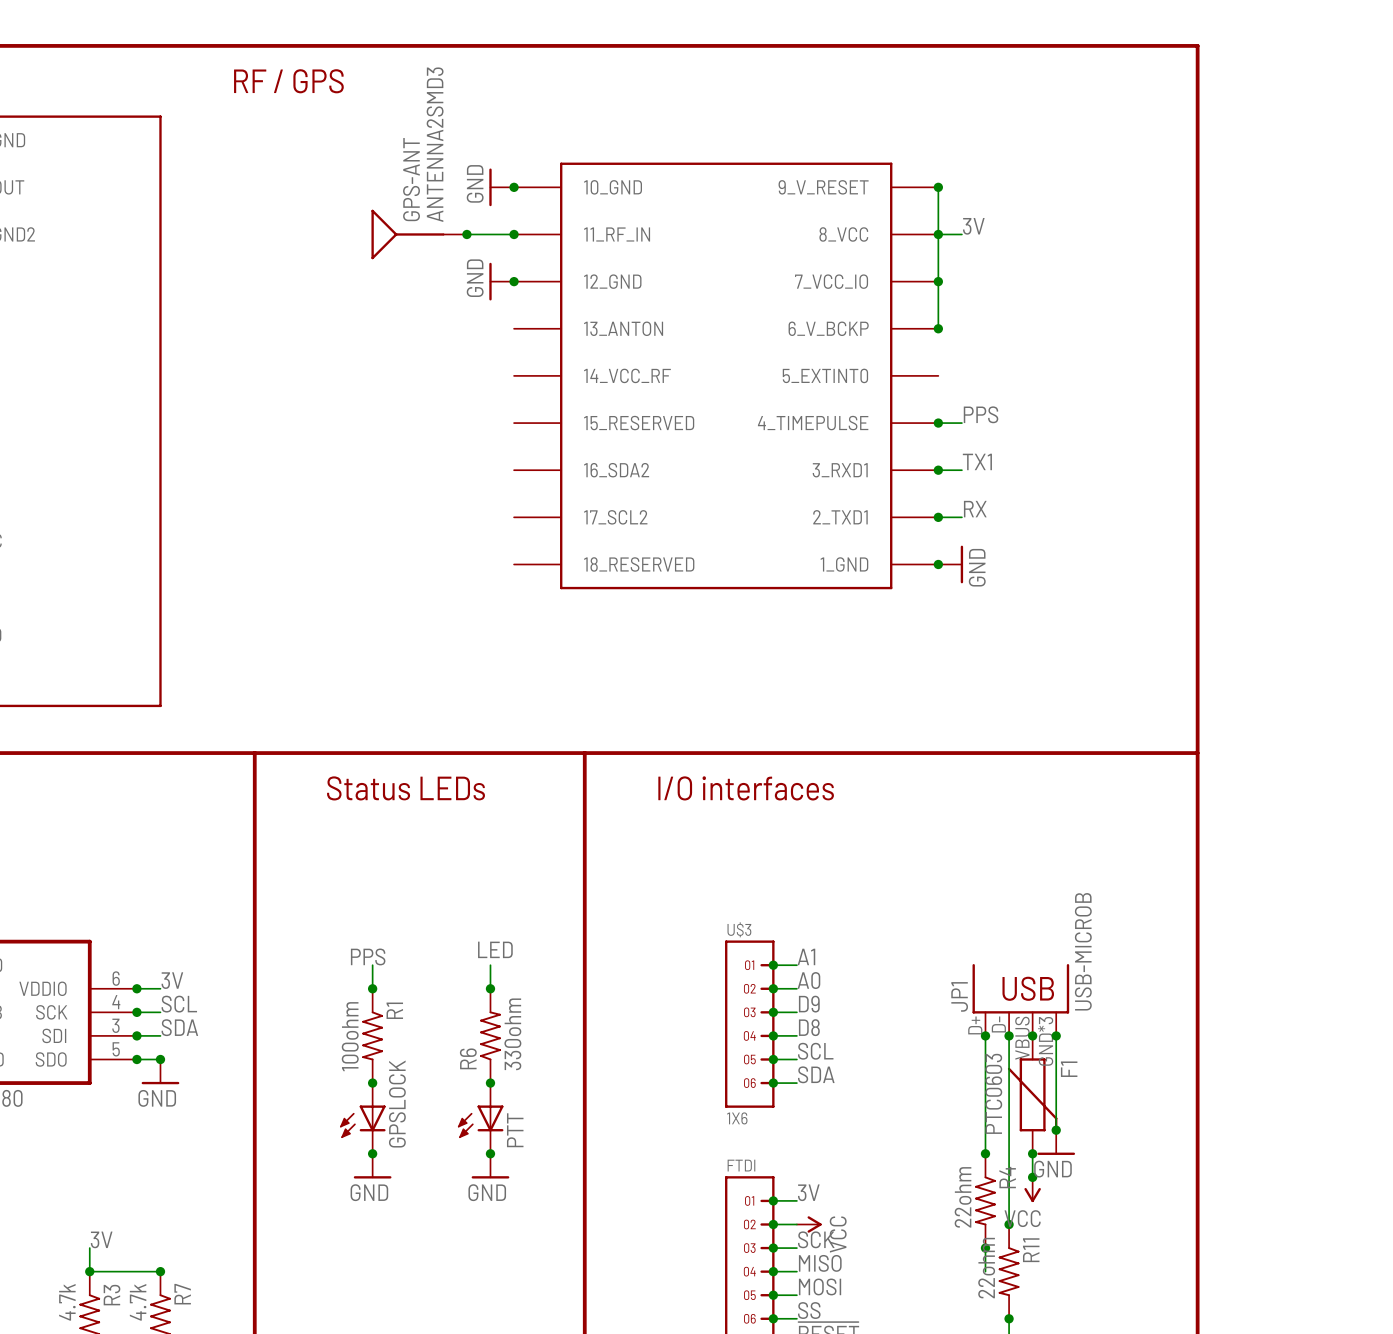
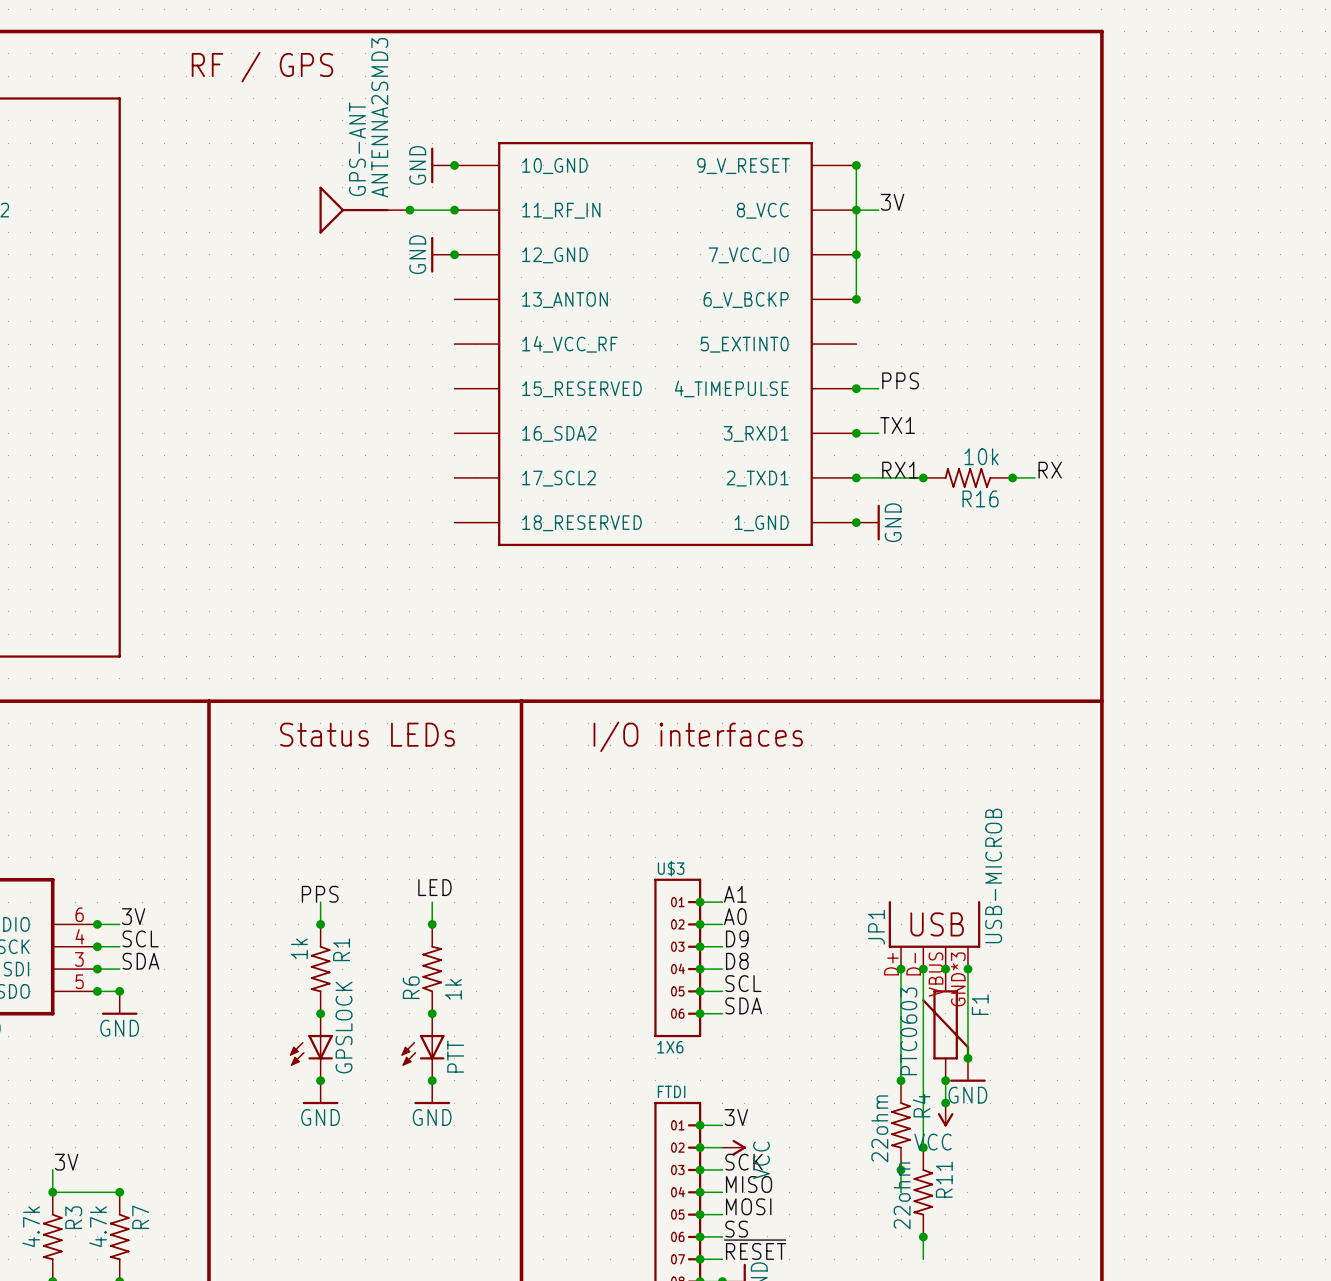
label: RX (975, 509) -> RX1 (900, 470)
label: none -> RX (1050, 470)
wire: none -> (878, 477) (923, 477)
junction: none -> (923, 477)
R16: none -> 10k (967, 477)
wire: none -> (1012, 477) (1034, 477)
junction: none -> (1012, 477)
R6 value: 330ohm (512, 1034) -> 1k (453, 989)
R1 value: 100ohm (350, 1036) -> 1k (299, 948)

